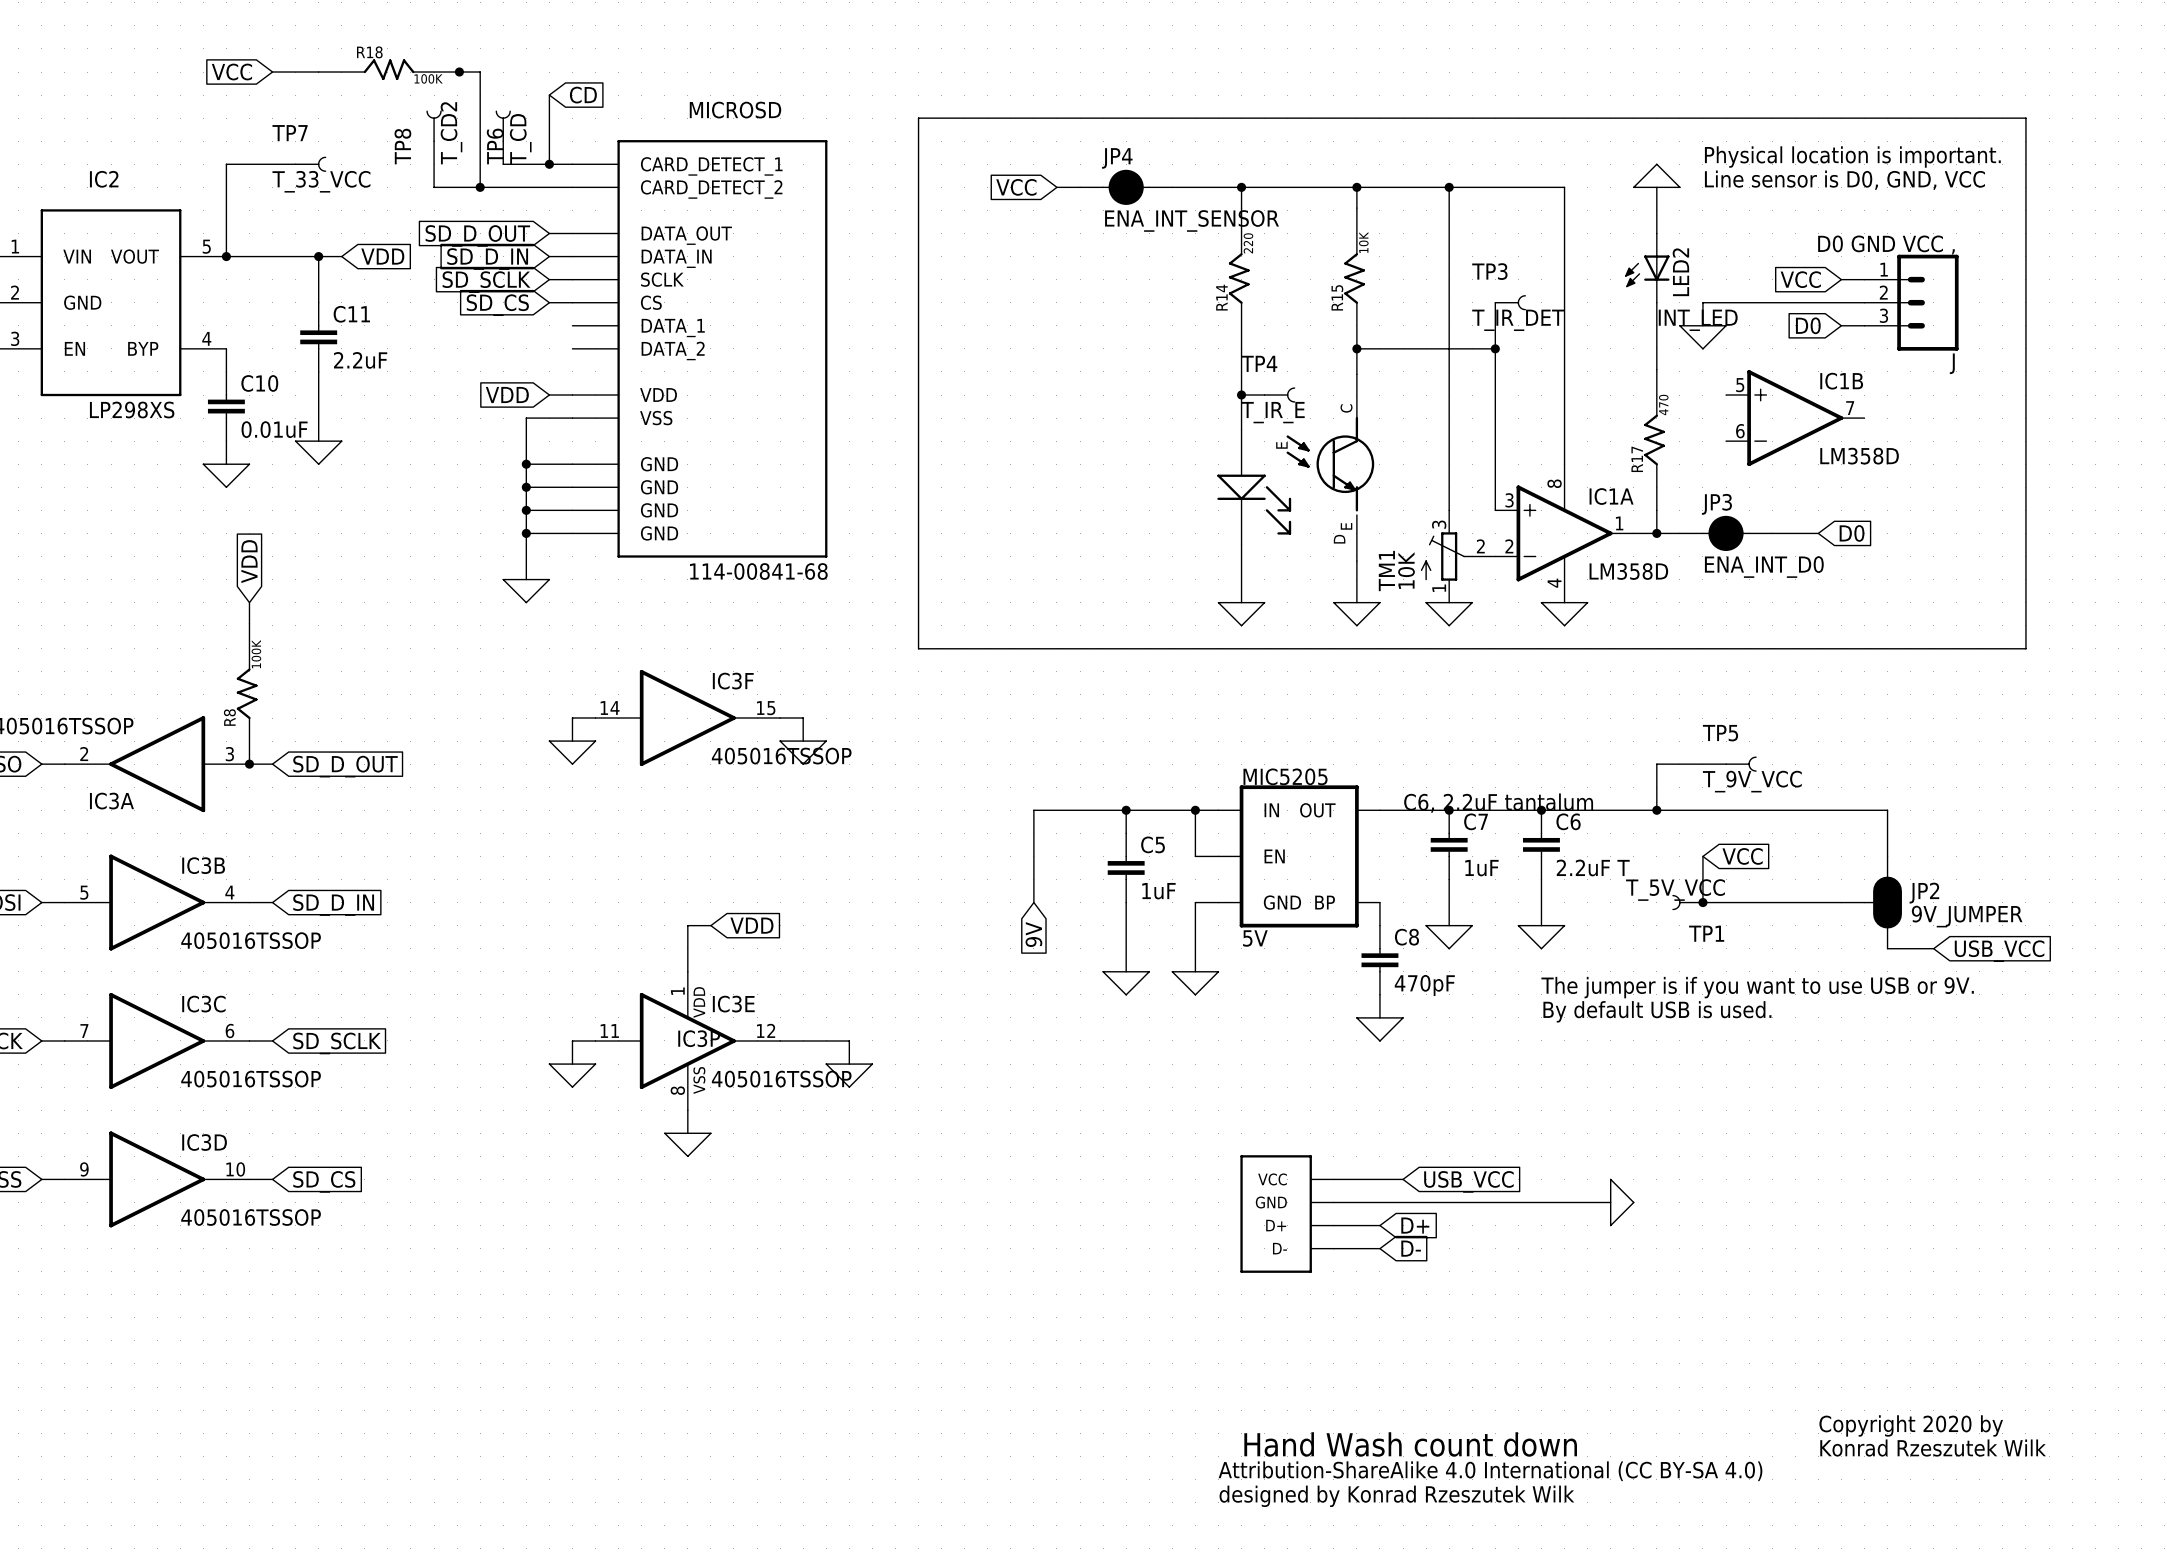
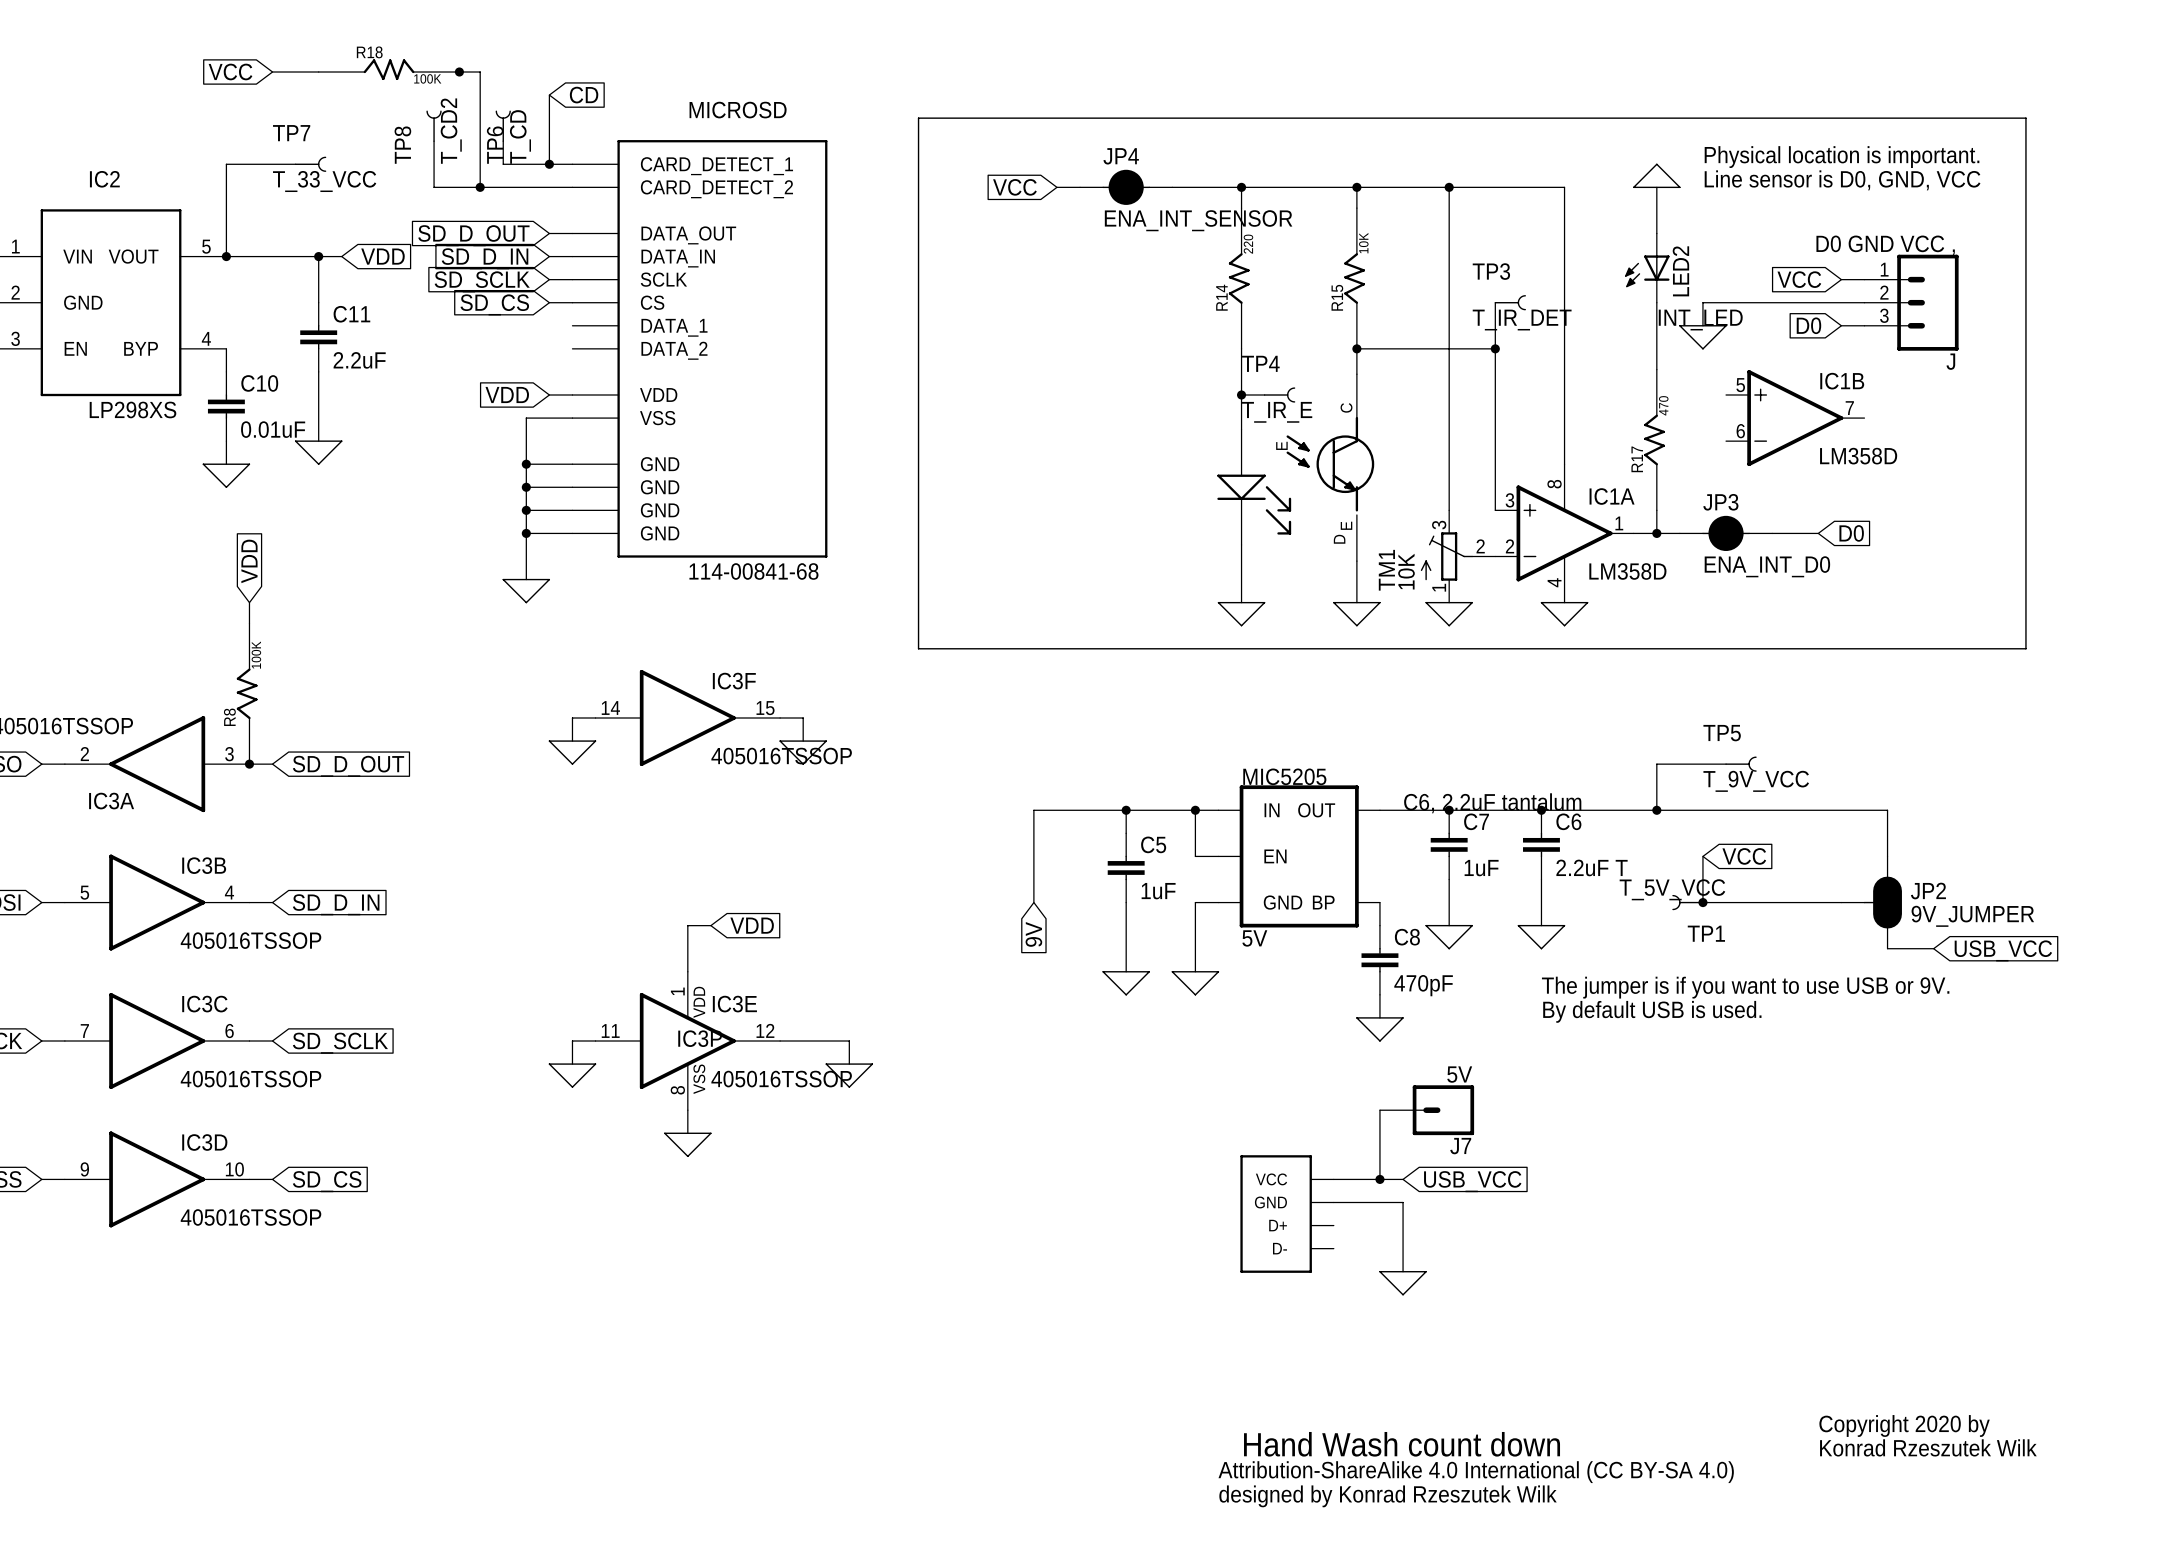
wire: none -> (1379, 1110) (1379, 1179)
J7: none -> 5V (1427, 1110)
junction: none -> (1379, 1179)
wire: (1403, 1202) (1610, 1202) -> (1403, 1202) (1403, 1271)
power symbol: (1622, 1202) -> none
wire: (1333, 1225) (1379, 1225) -> none
global label: D+ (1415, 1225) -> none
wire: (1333, 1248) (1379, 1248) -> none
global label: D- (1411, 1248) -> none
power symbol: none -> (1403, 1283)

